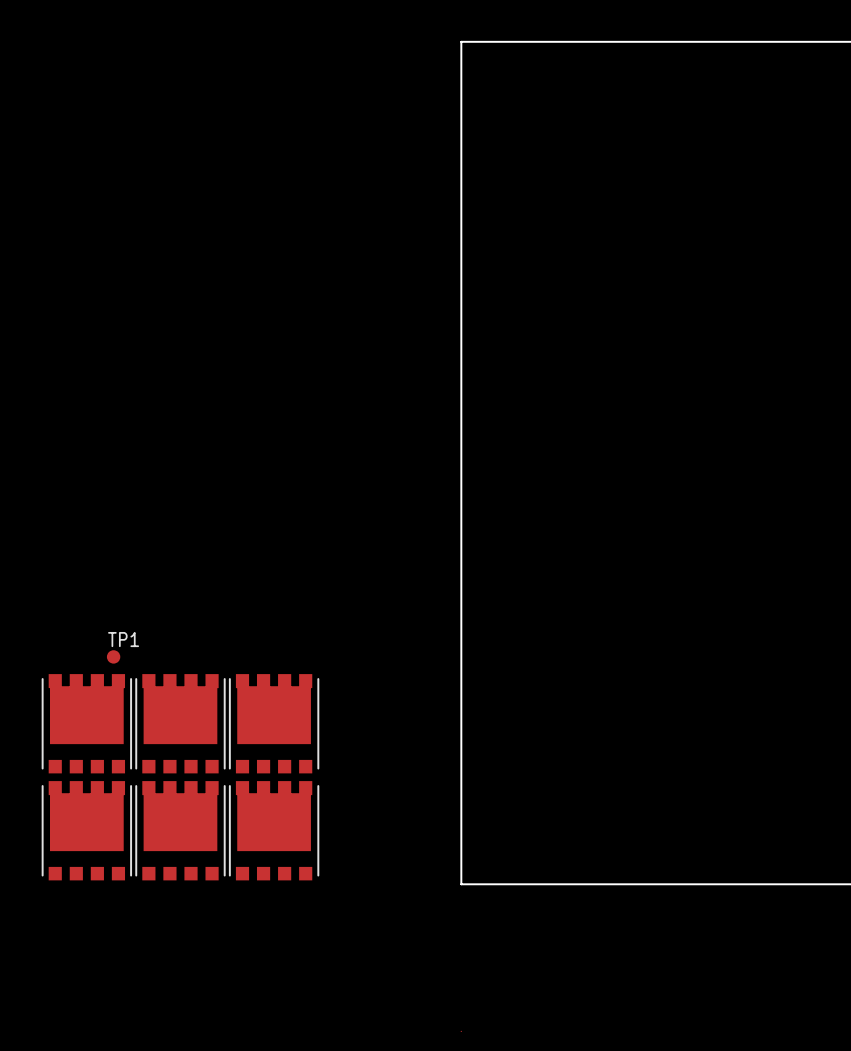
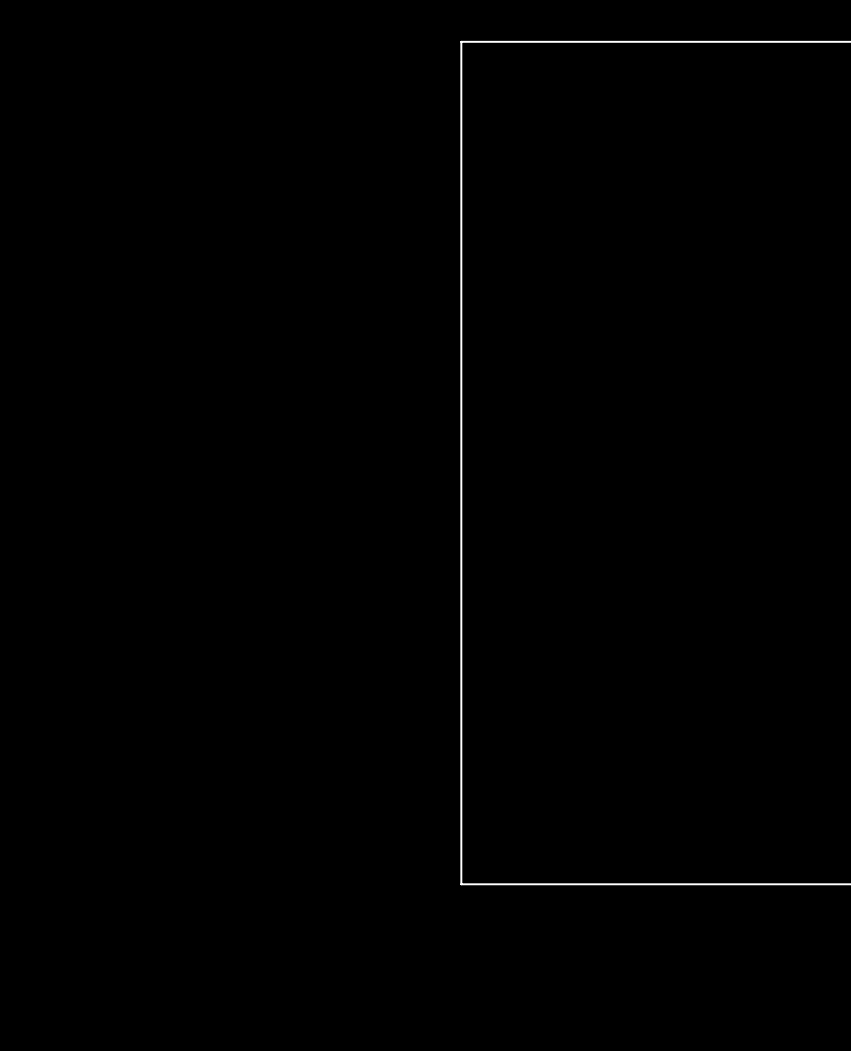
TP1: (113, 656) -> none
part: (86, 723) -> none
part: (180, 723) -> none
part: (274, 723) -> none
part: (86, 830) -> none
part: (180, 830) -> none
part: (274, 830) -> none

